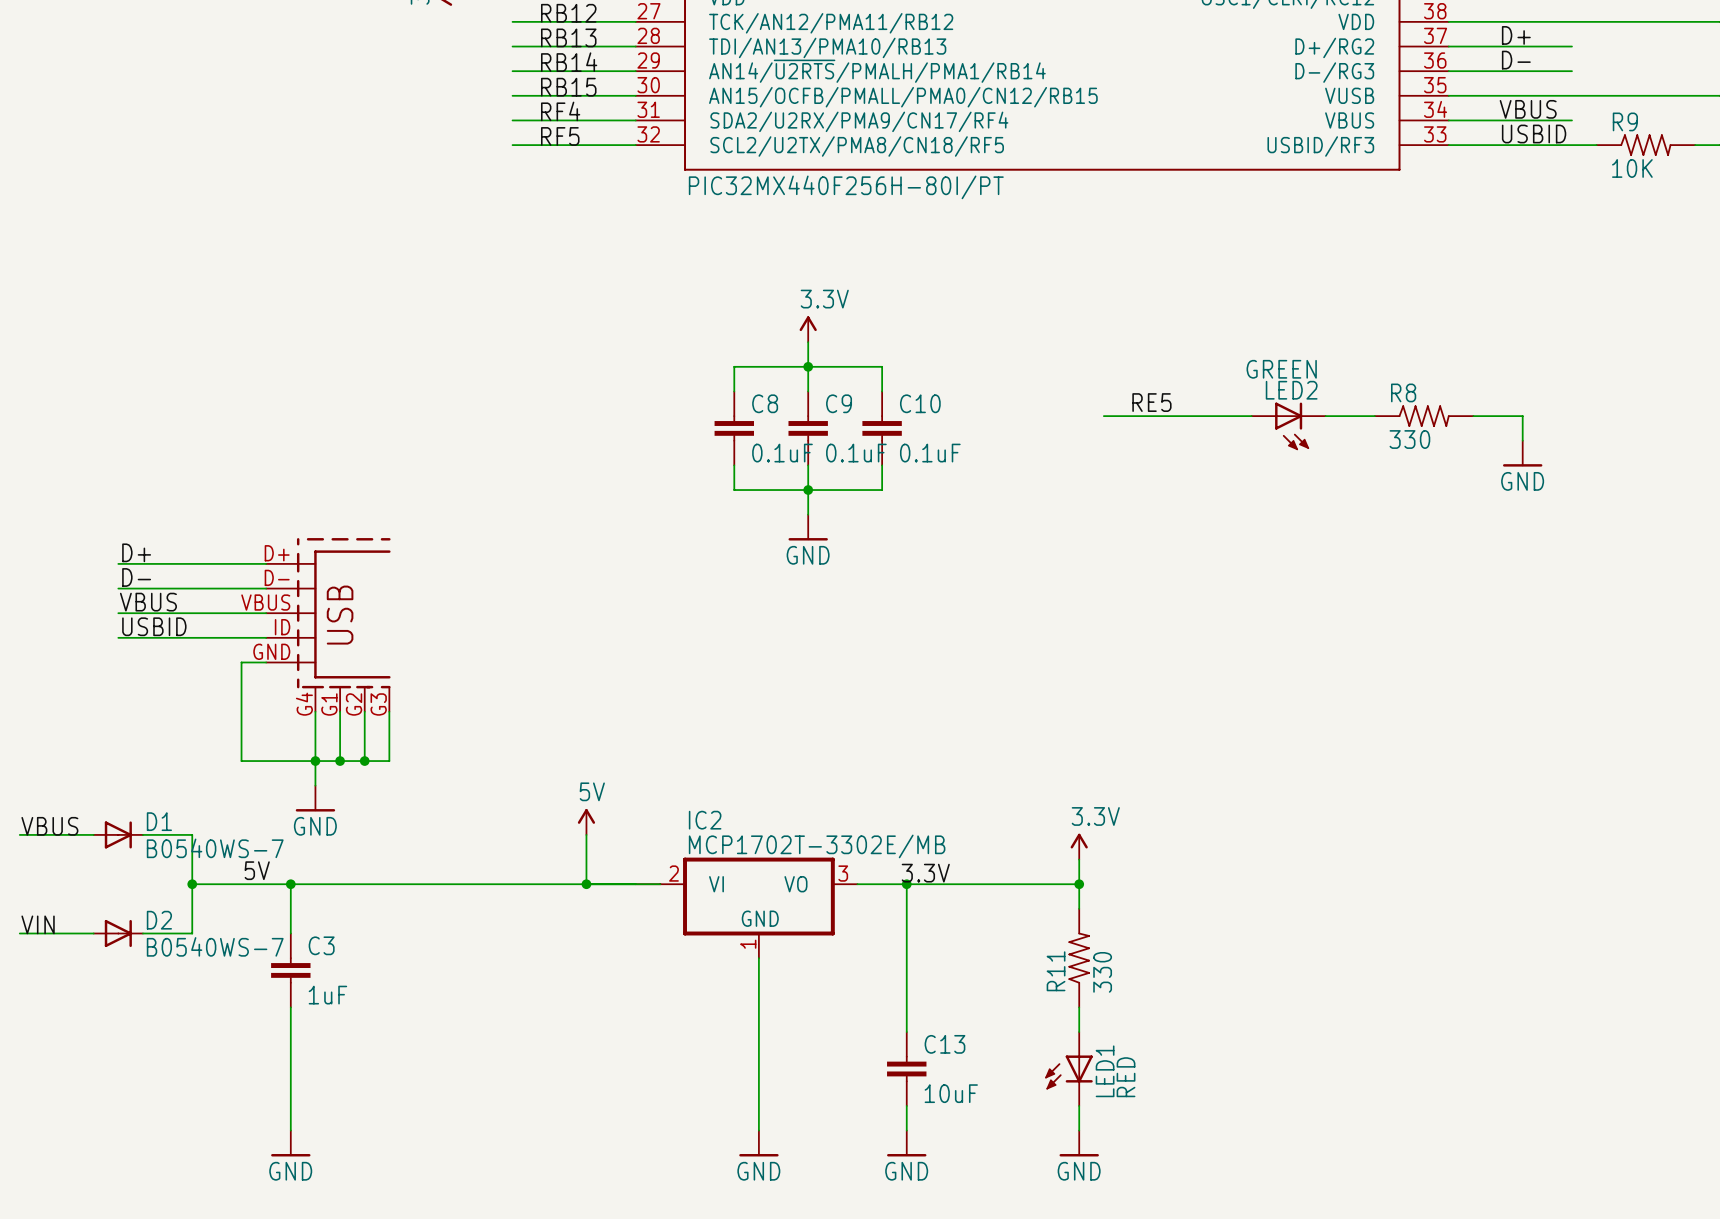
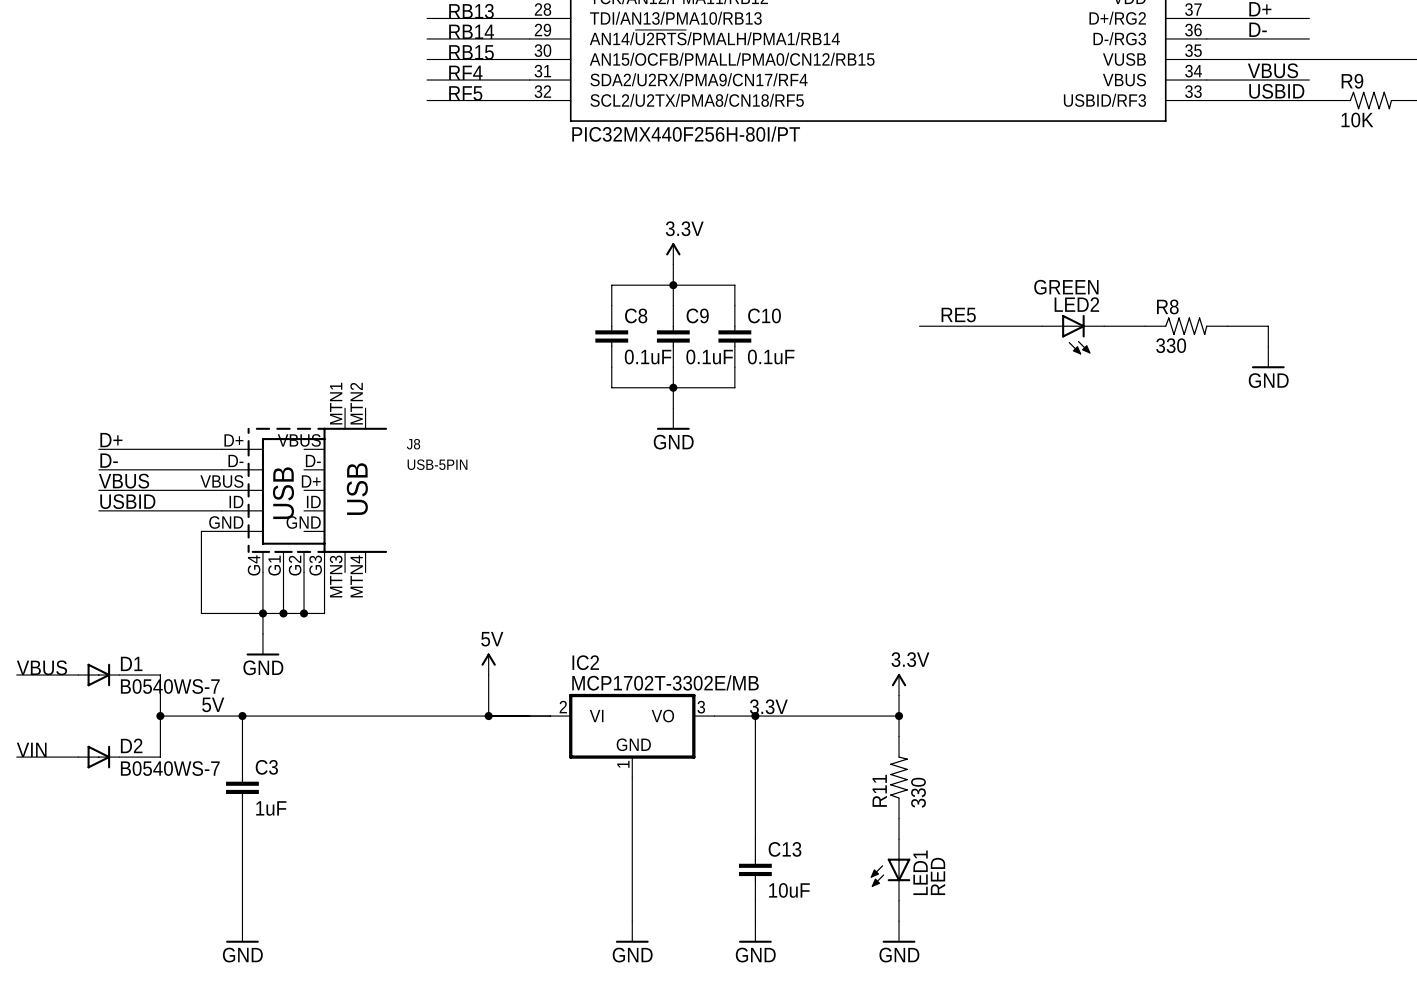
J8: none -> USB-5PIN (345, 490)

